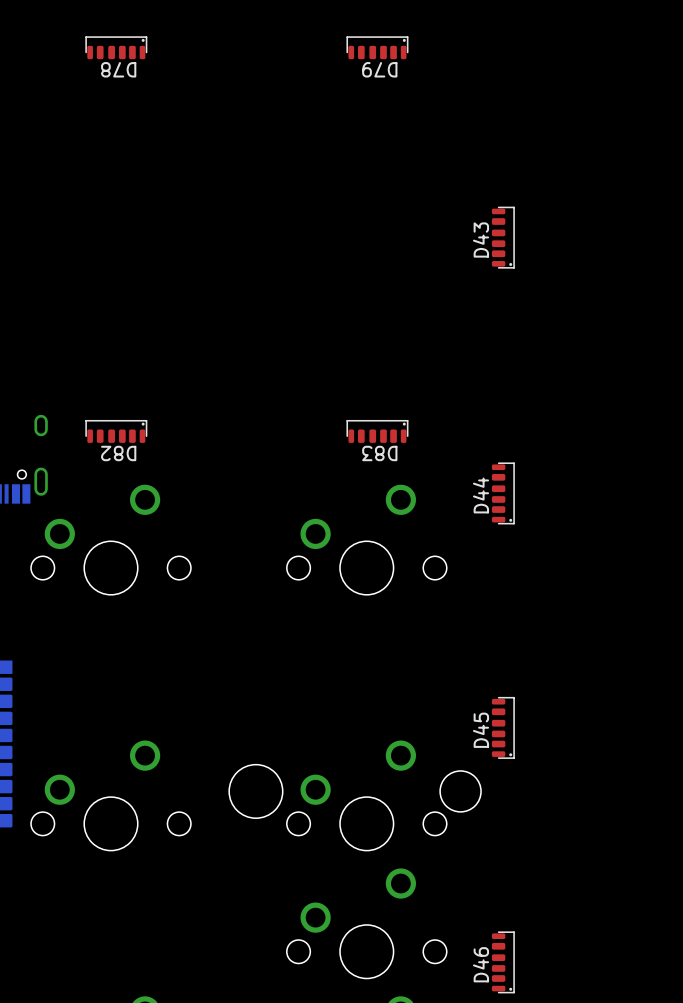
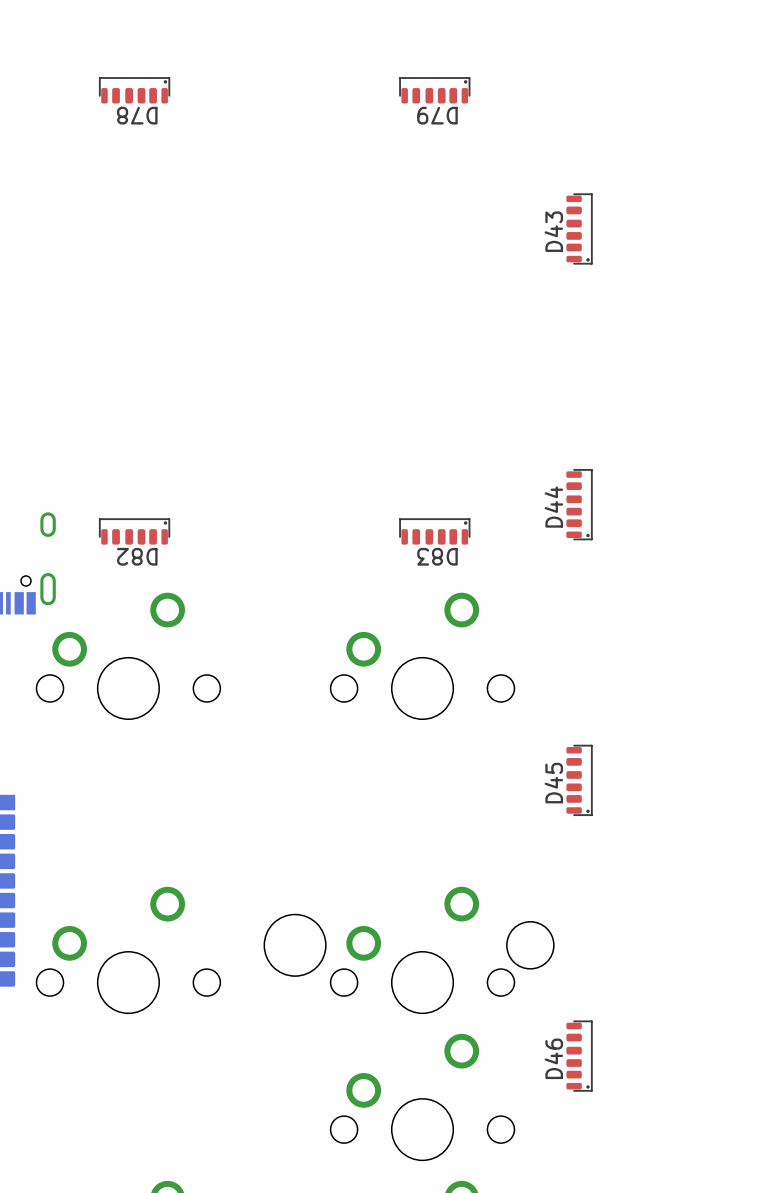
D43 position: (503, 237) -> (579, 228)
D44 position: (503, 493) -> (579, 504)
D45 position: (503, 727) -> (579, 780)
D46 position: (503, 962) -> (579, 1056)

